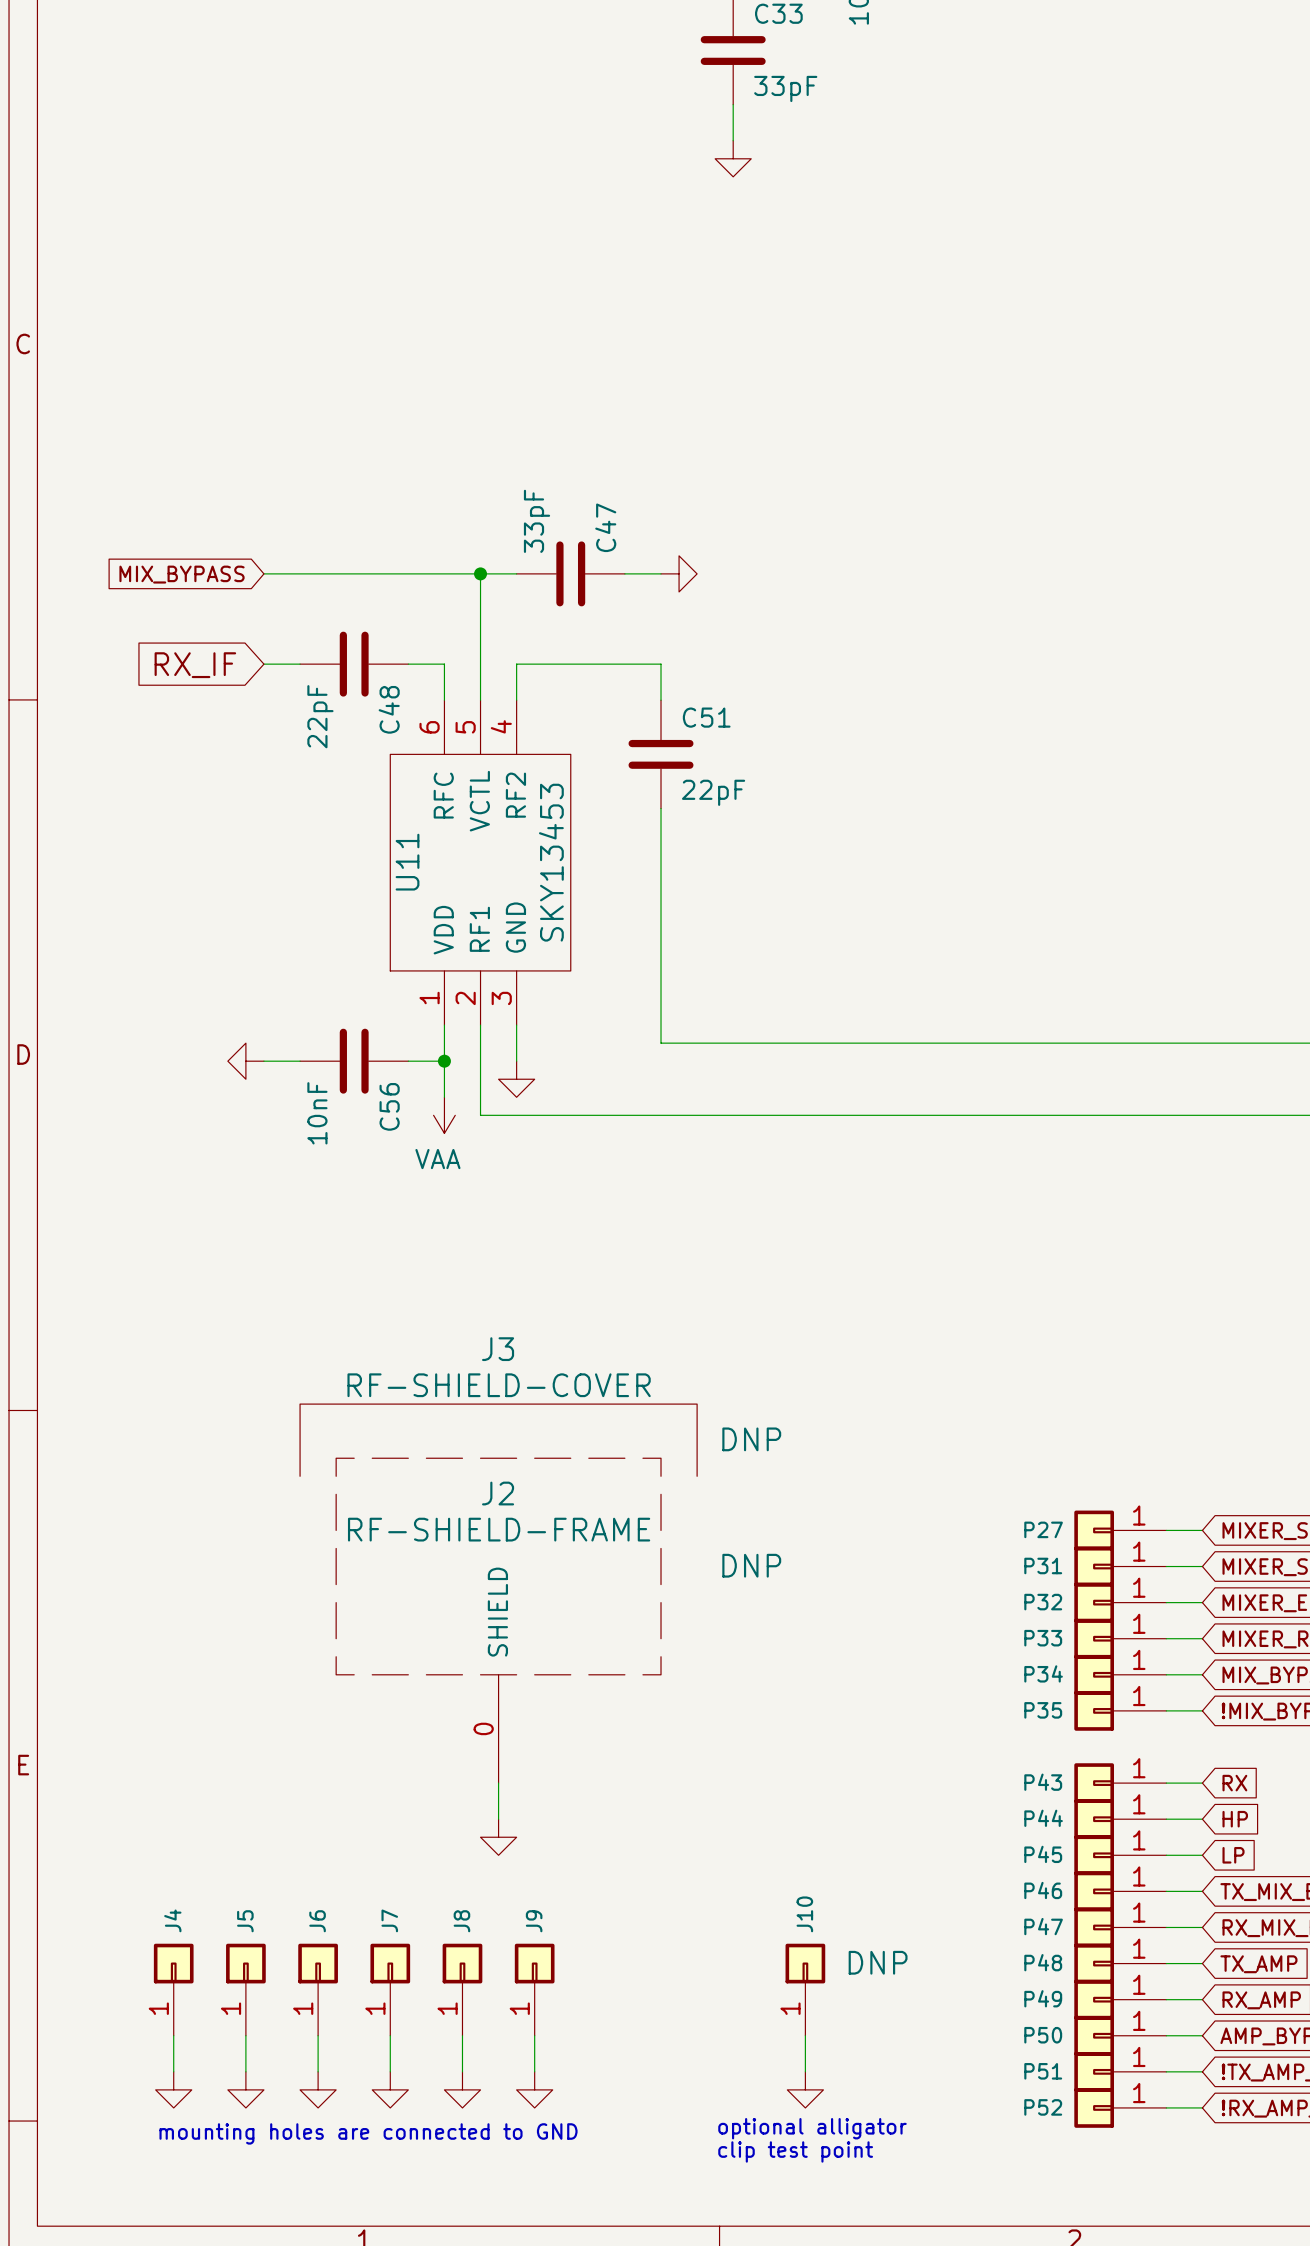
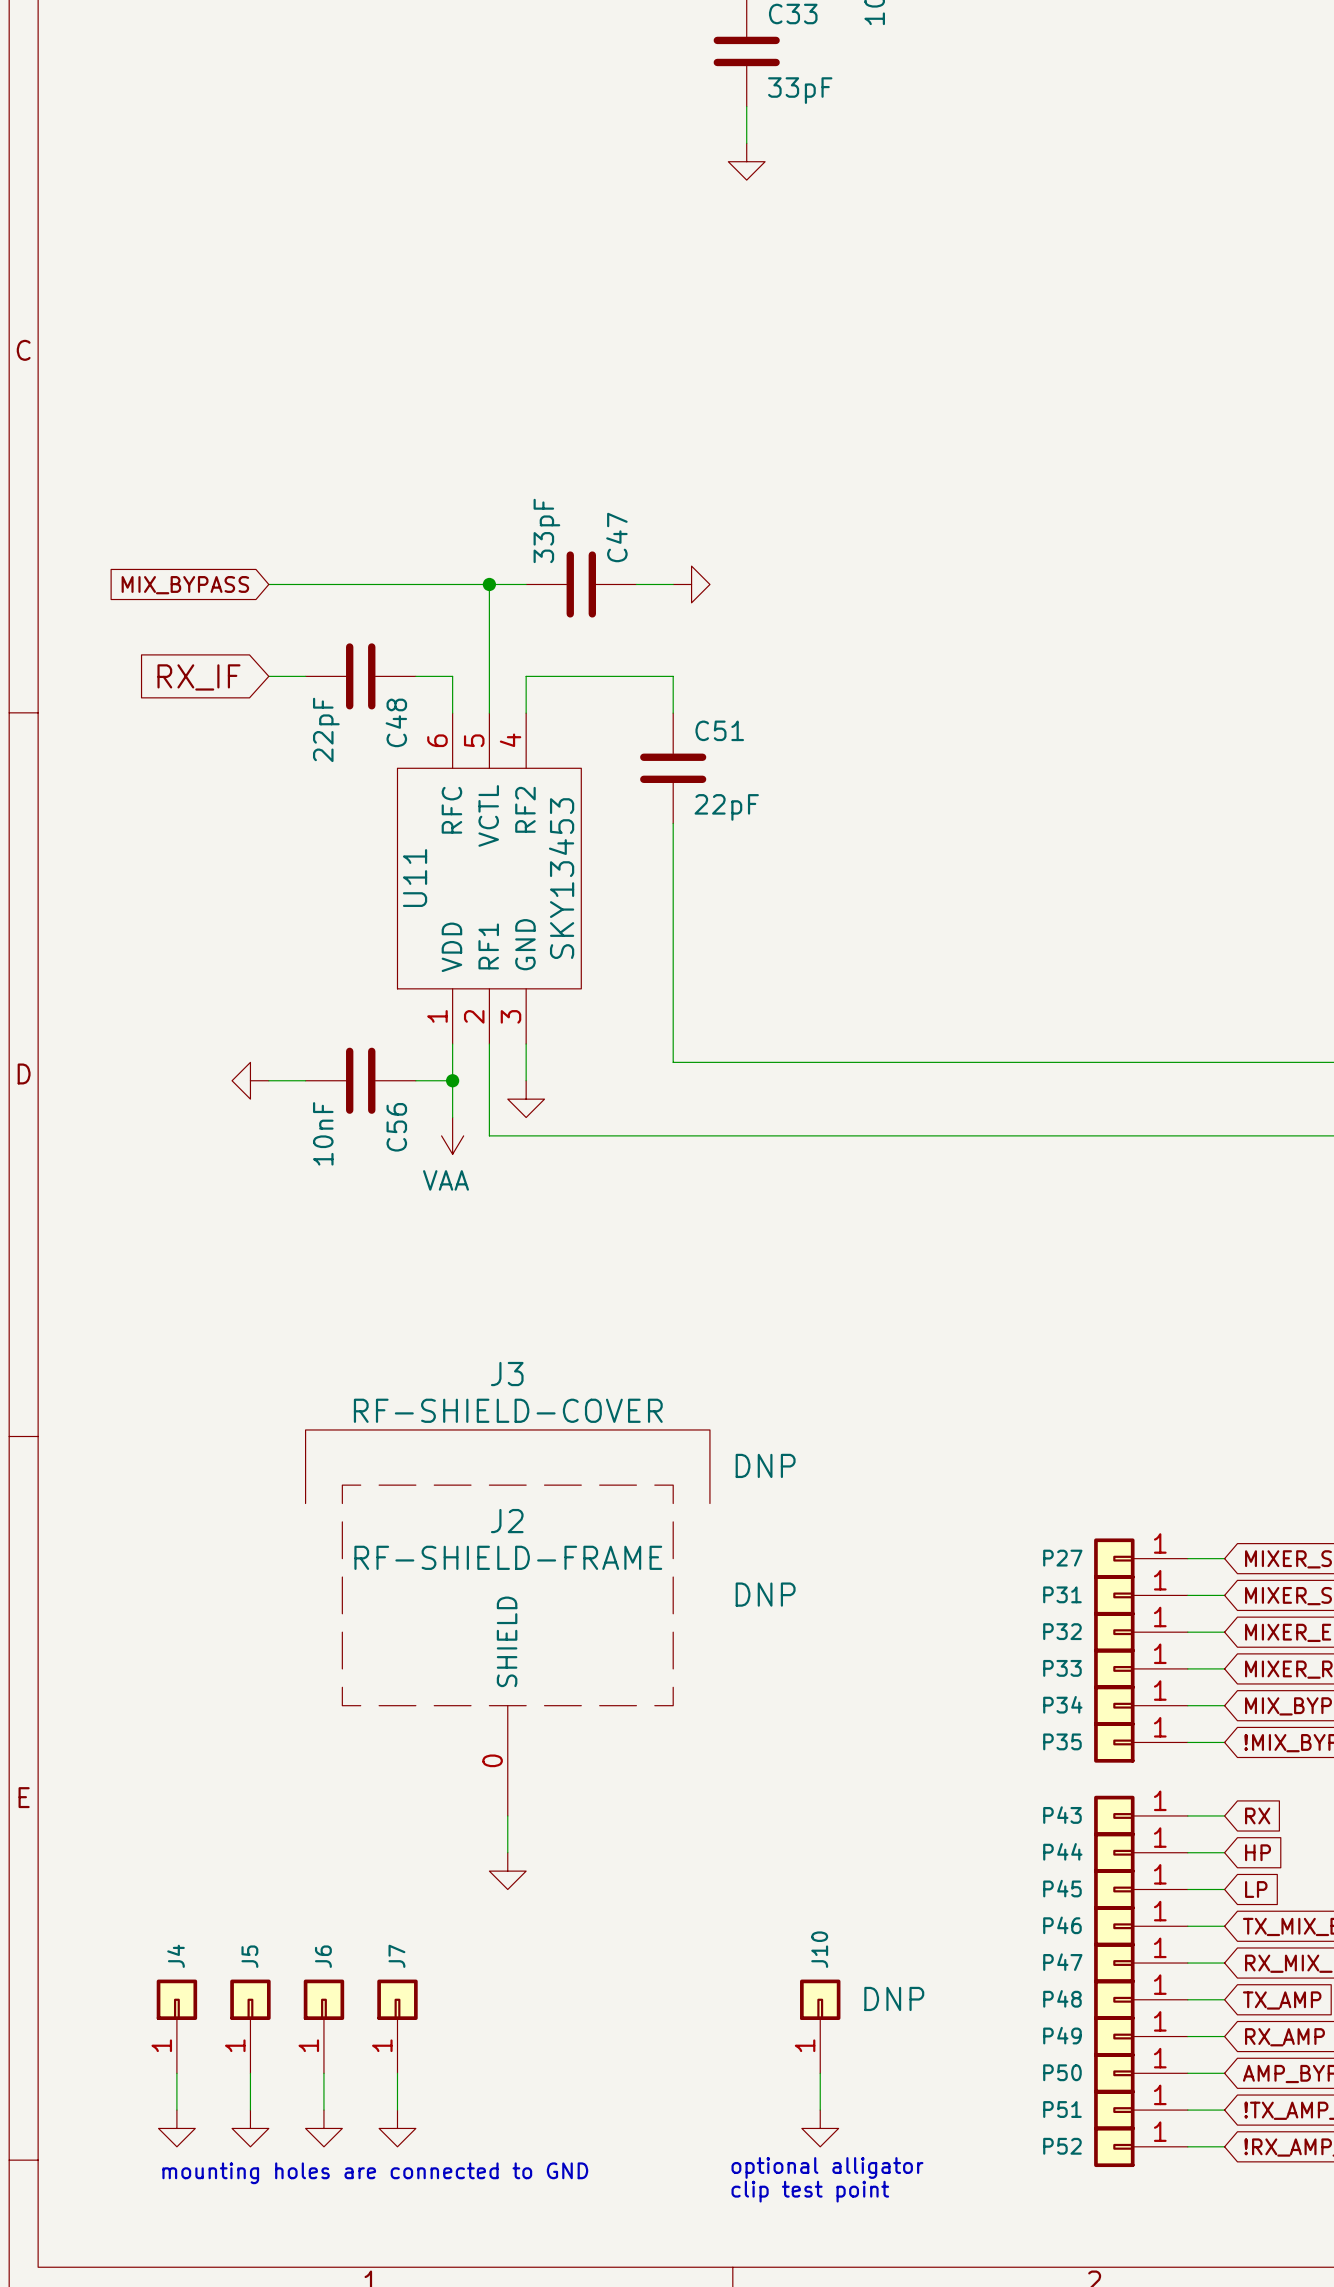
J8: (462, 1989) -> none
J9: (534, 1989) -> none
wire: (462, 2035) (462, 2071) -> none
wire: (534, 2035) (534, 2071) -> none
power symbol: (462, 2089) -> none
power symbol: (534, 2089) -> none

